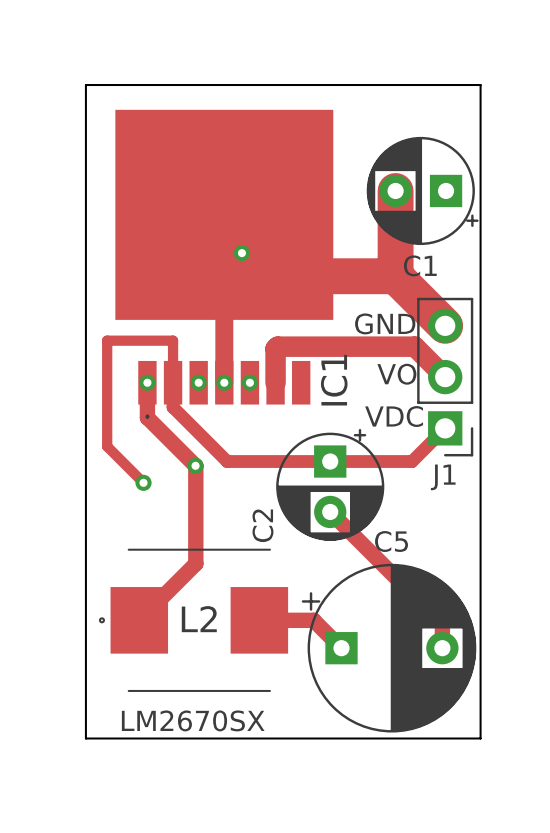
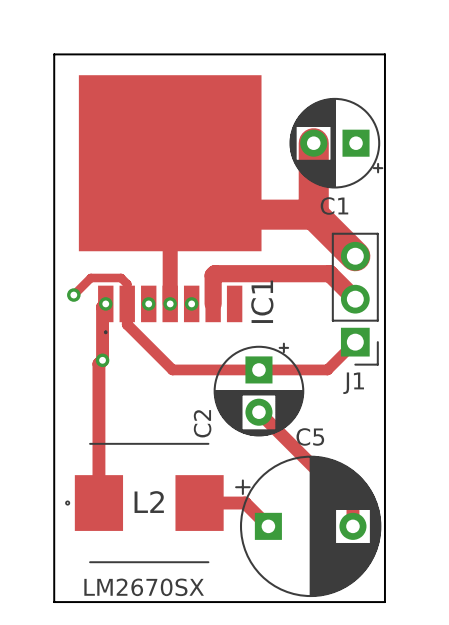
via: (241, 253) -> none
text: GND (385, 323) -> none
track: (173, 359) (173, 340) (107, 340) (107, 446) (143, 482) -> (127, 284) (121, 277) (90, 277) (73, 295)
via: none -> (73, 295)
text: VO (396, 374) -> none
track: (147, 382) (147, 417) (195, 466) (195, 563) (139, 620) -> (105, 303) (102, 307) (102, 360) (98, 363) (98, 503)
text: VDC (394, 416) -> none
via: none -> (102, 360)
via: (195, 465) -> none
via: (143, 482) -> none

